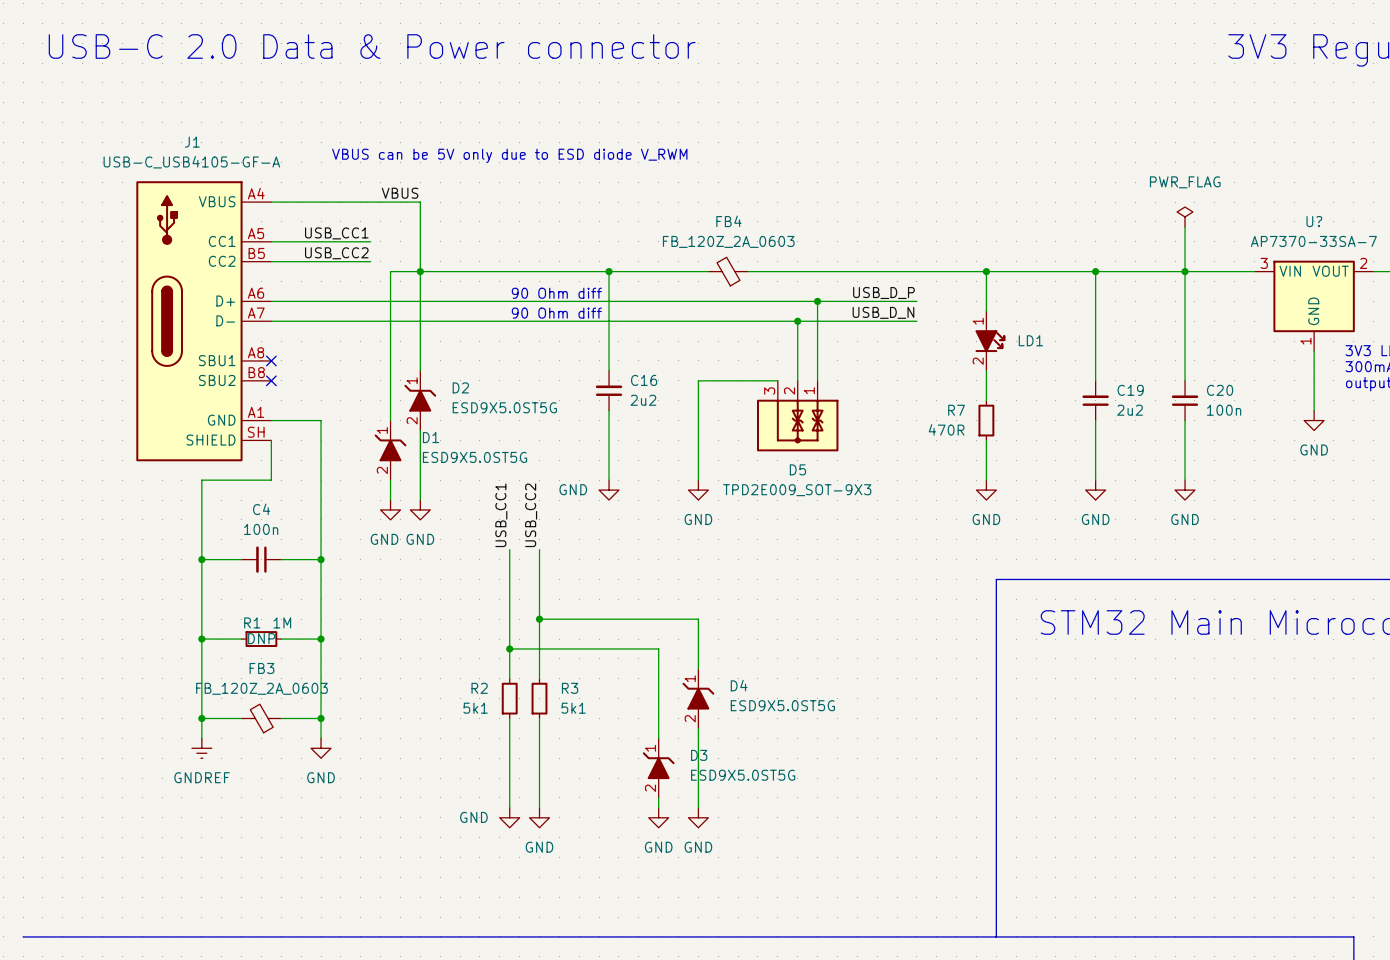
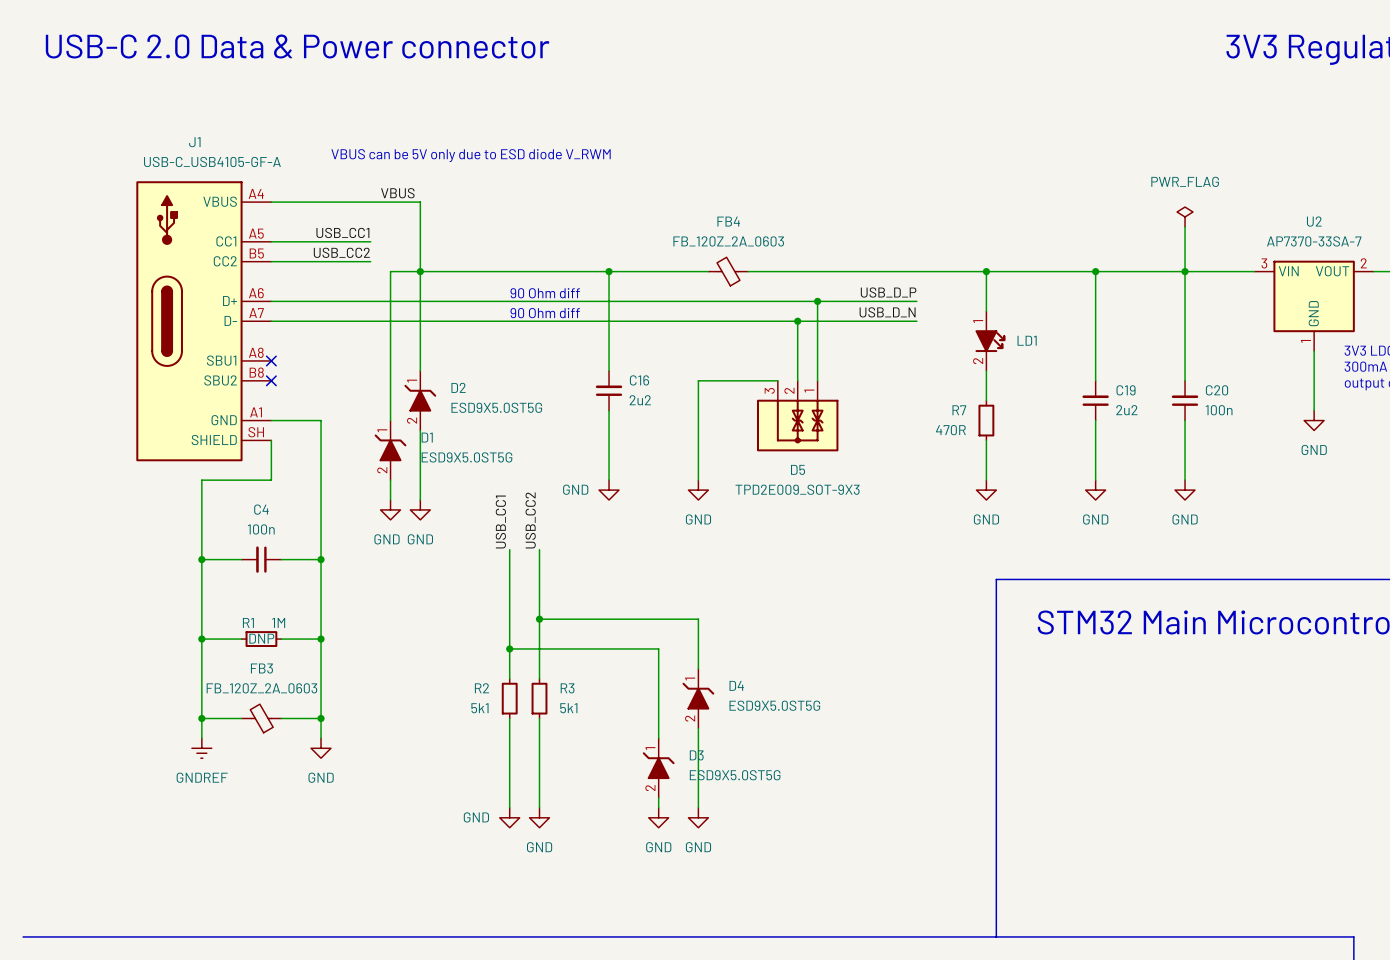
U? name: U? (1314, 221) -> U2 (1314, 221)

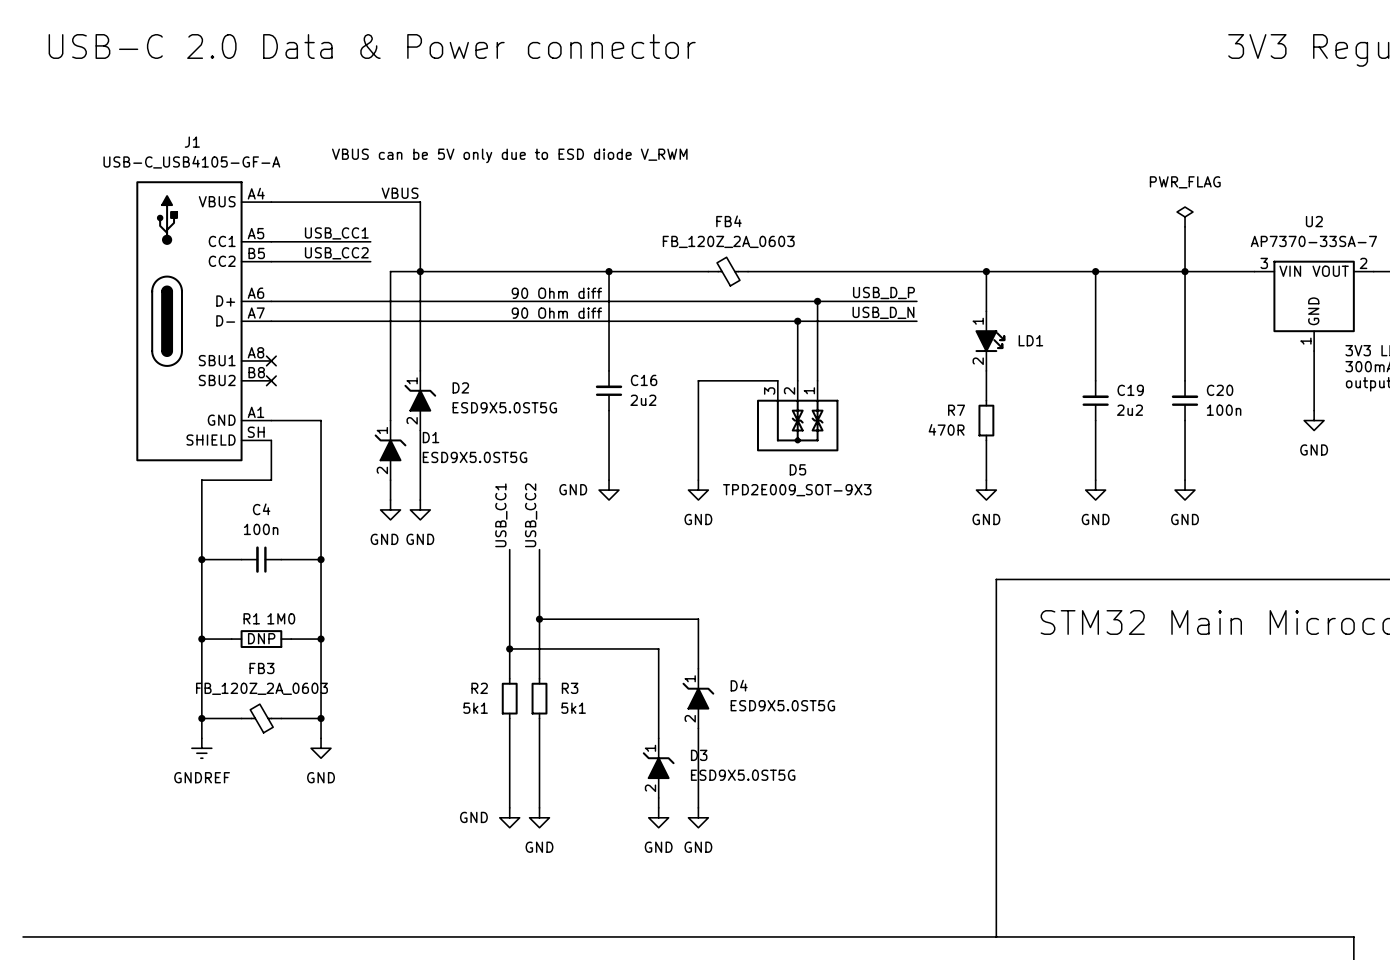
R1 text: 1M (278, 622) -> 1M0 (281, 618)
R1 symbol: [241, 631, 282, 647] -> [231, 630, 292, 648]

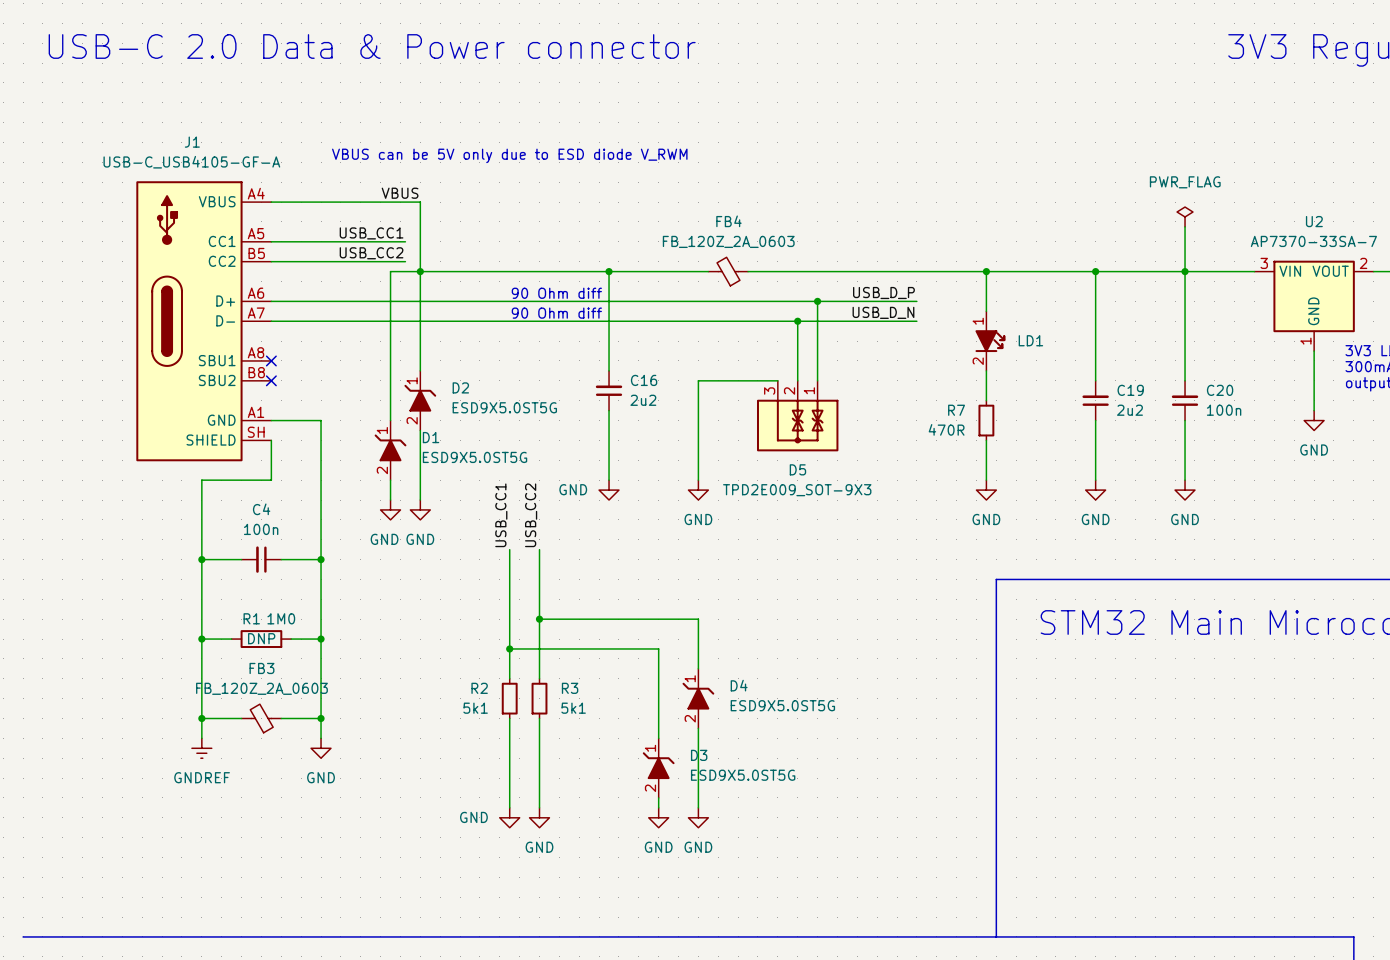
label position: USB_CC1 (336, 233) -> USB_CC1 (371, 233)
wire: none -> (370, 241) (405, 241)
label position: USB_CC2 (336, 253) -> USB_CC2 (371, 253)
wire: none -> (370, 261) (405, 261)

